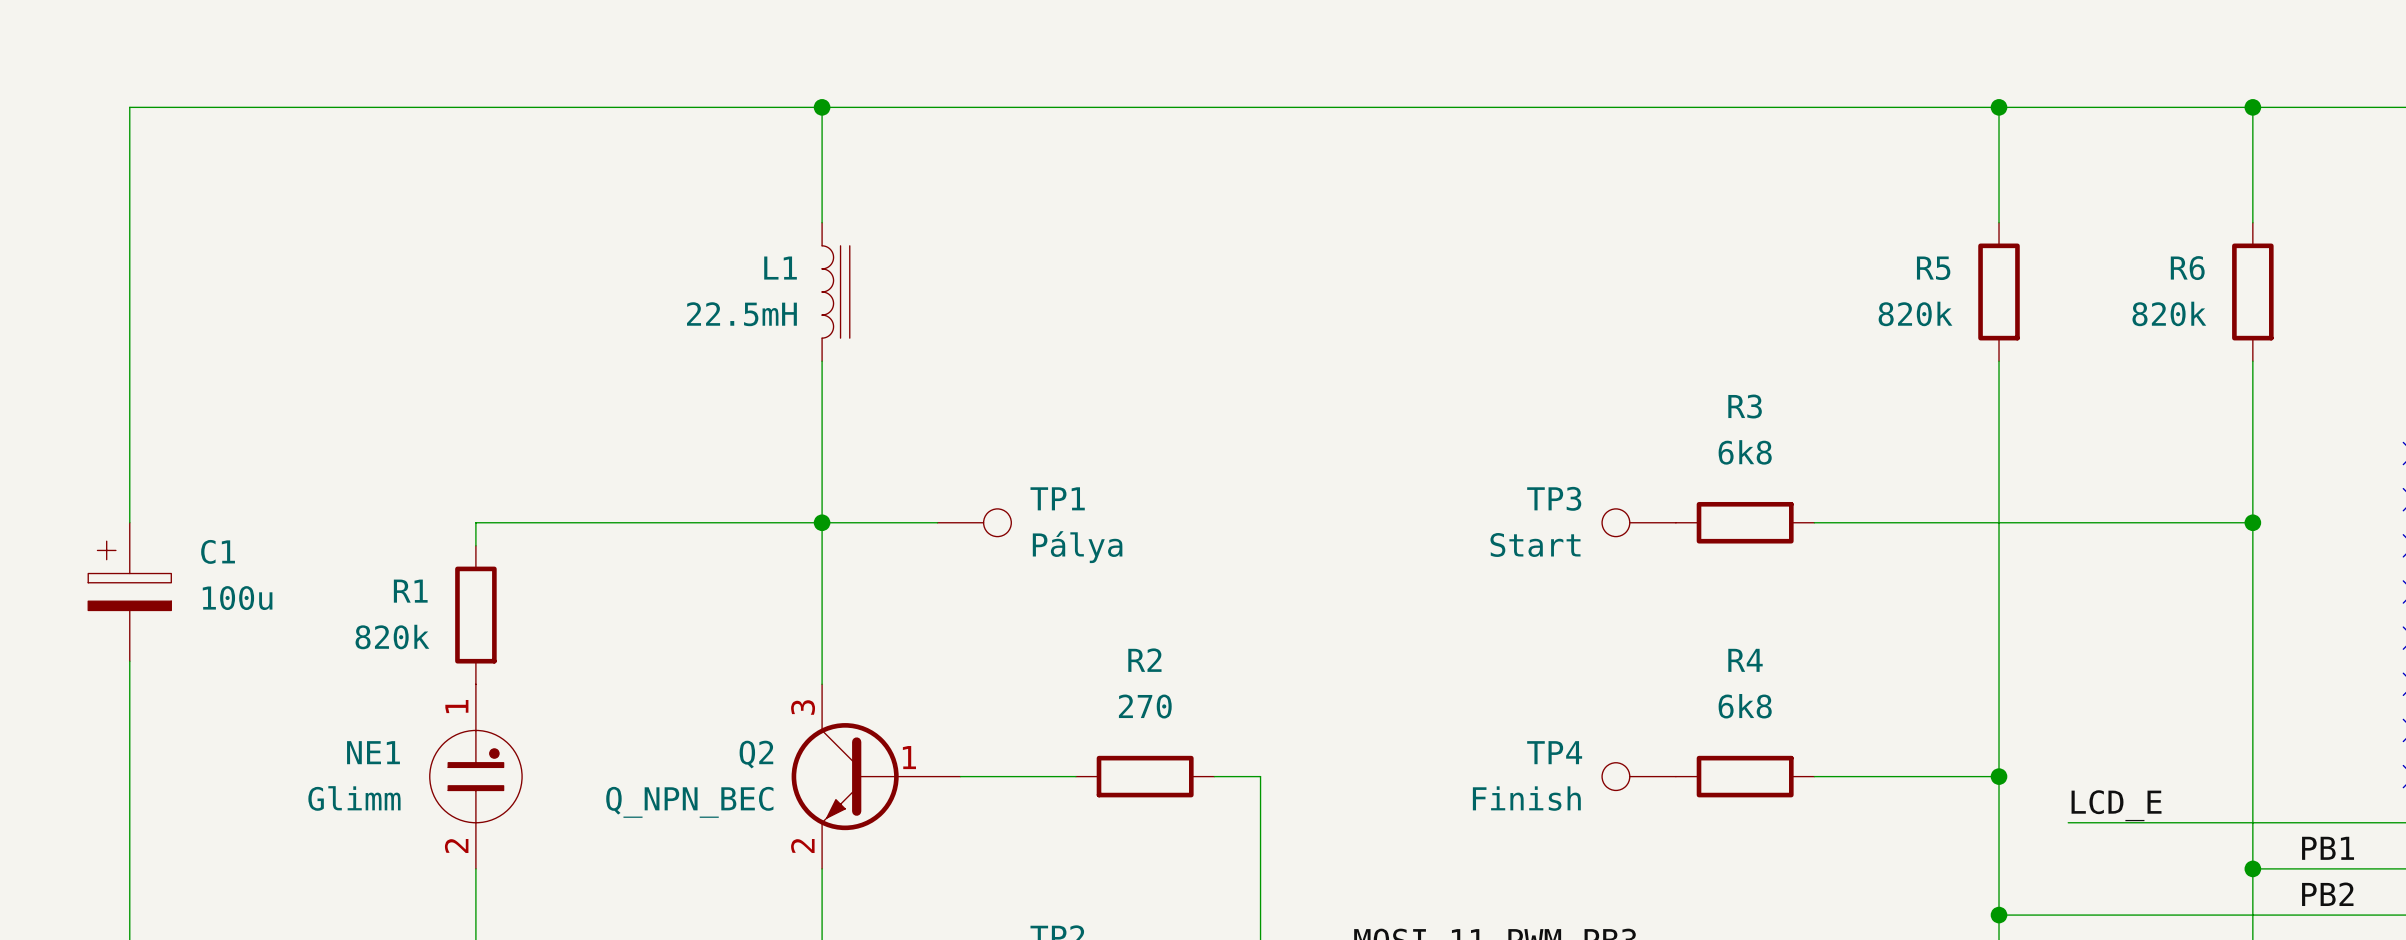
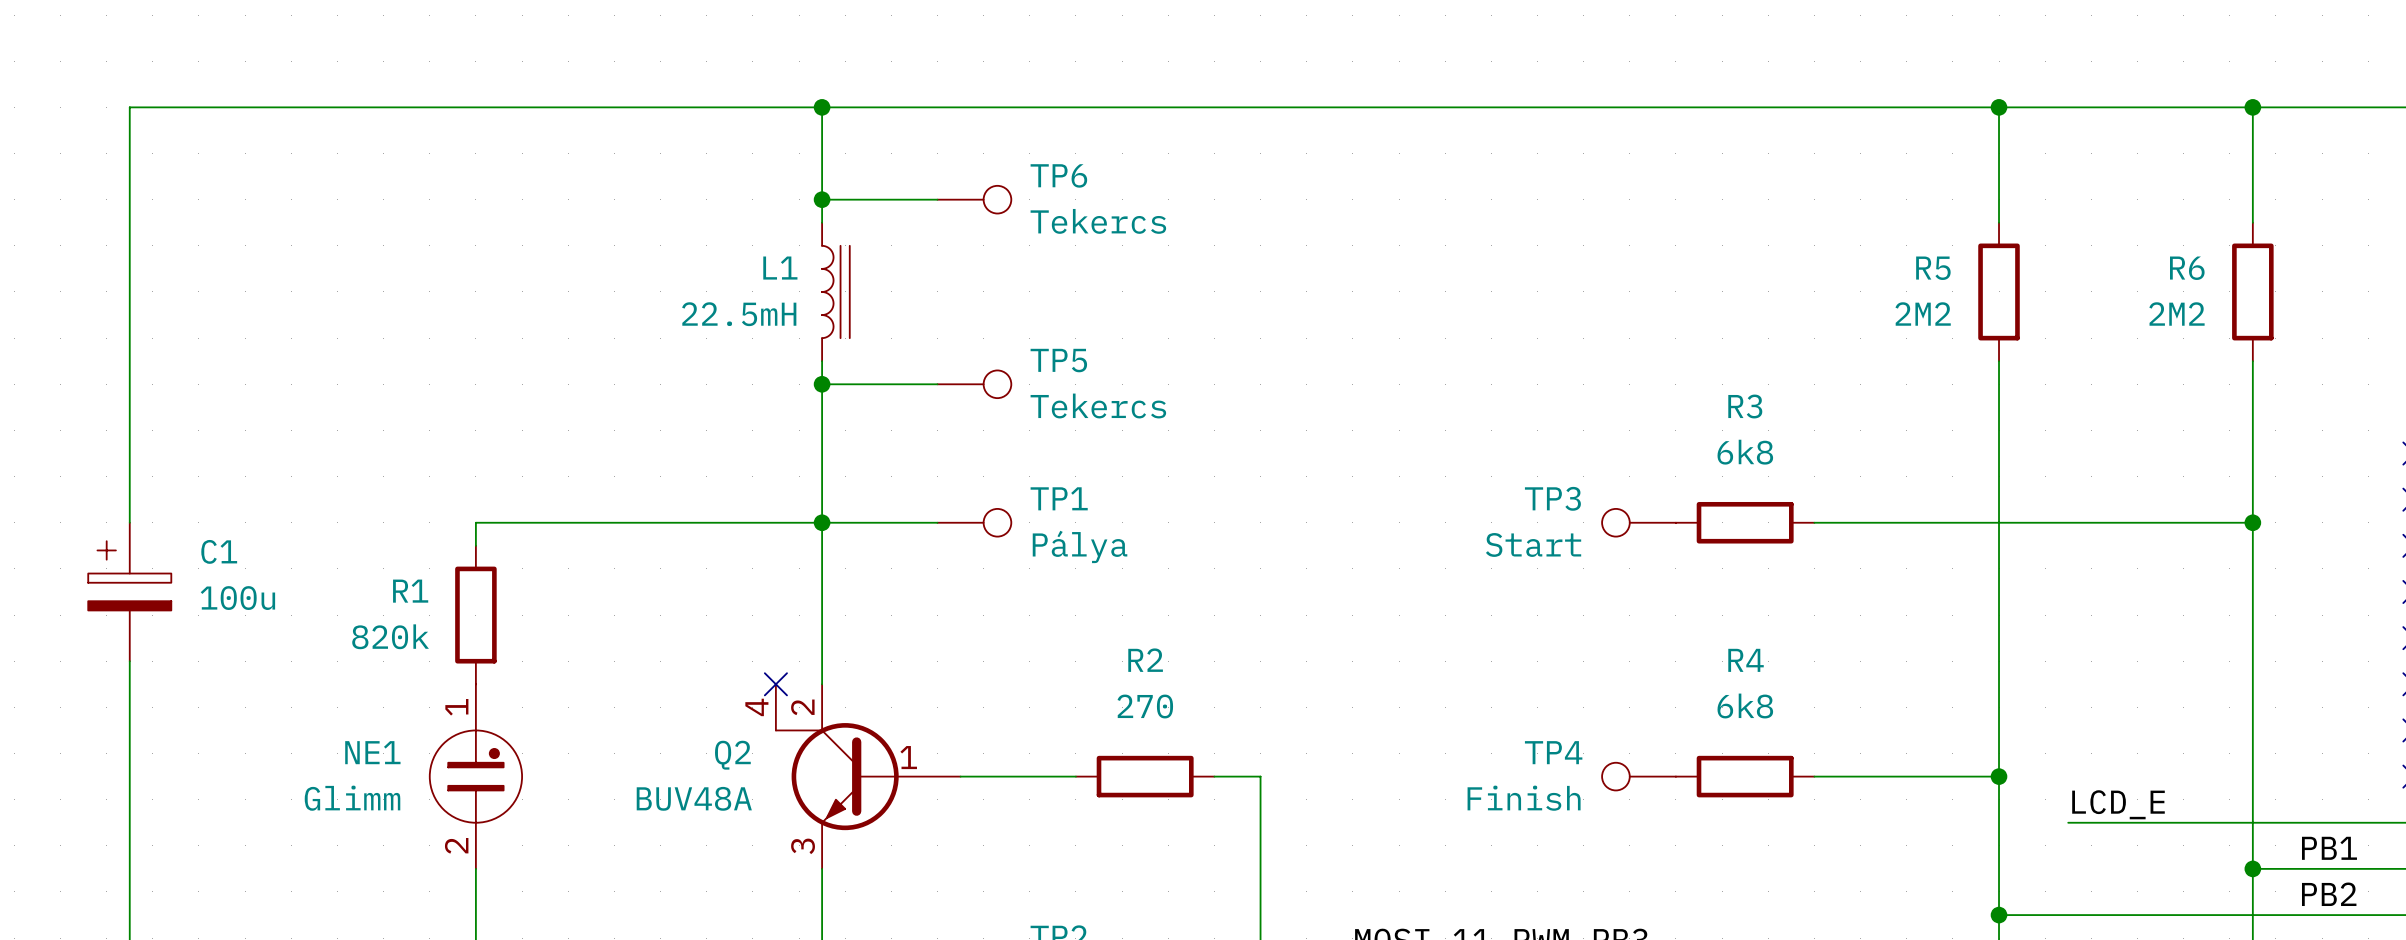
wire: none -> (822, 199) (937, 199)
junction: none -> (822, 199)
TP6: none -> Tekercs (974, 199)
R5 value: 820k (1915, 313) -> 2M2 (1923, 314)
R6 value: 820k (2169, 313) -> 2M2 (2176, 314)
wire: none -> (822, 384) (937, 384)
junction: none -> (822, 384)
TP5: none -> Tekercs (974, 384)
no-connect mark: none -> (775, 684)
Q2 symbol: [791, 684, 961, 869] -> [775, 684, 961, 869]
Q2 value: Q_NPN_BEC (689, 802) -> BUV48A (694, 798)

